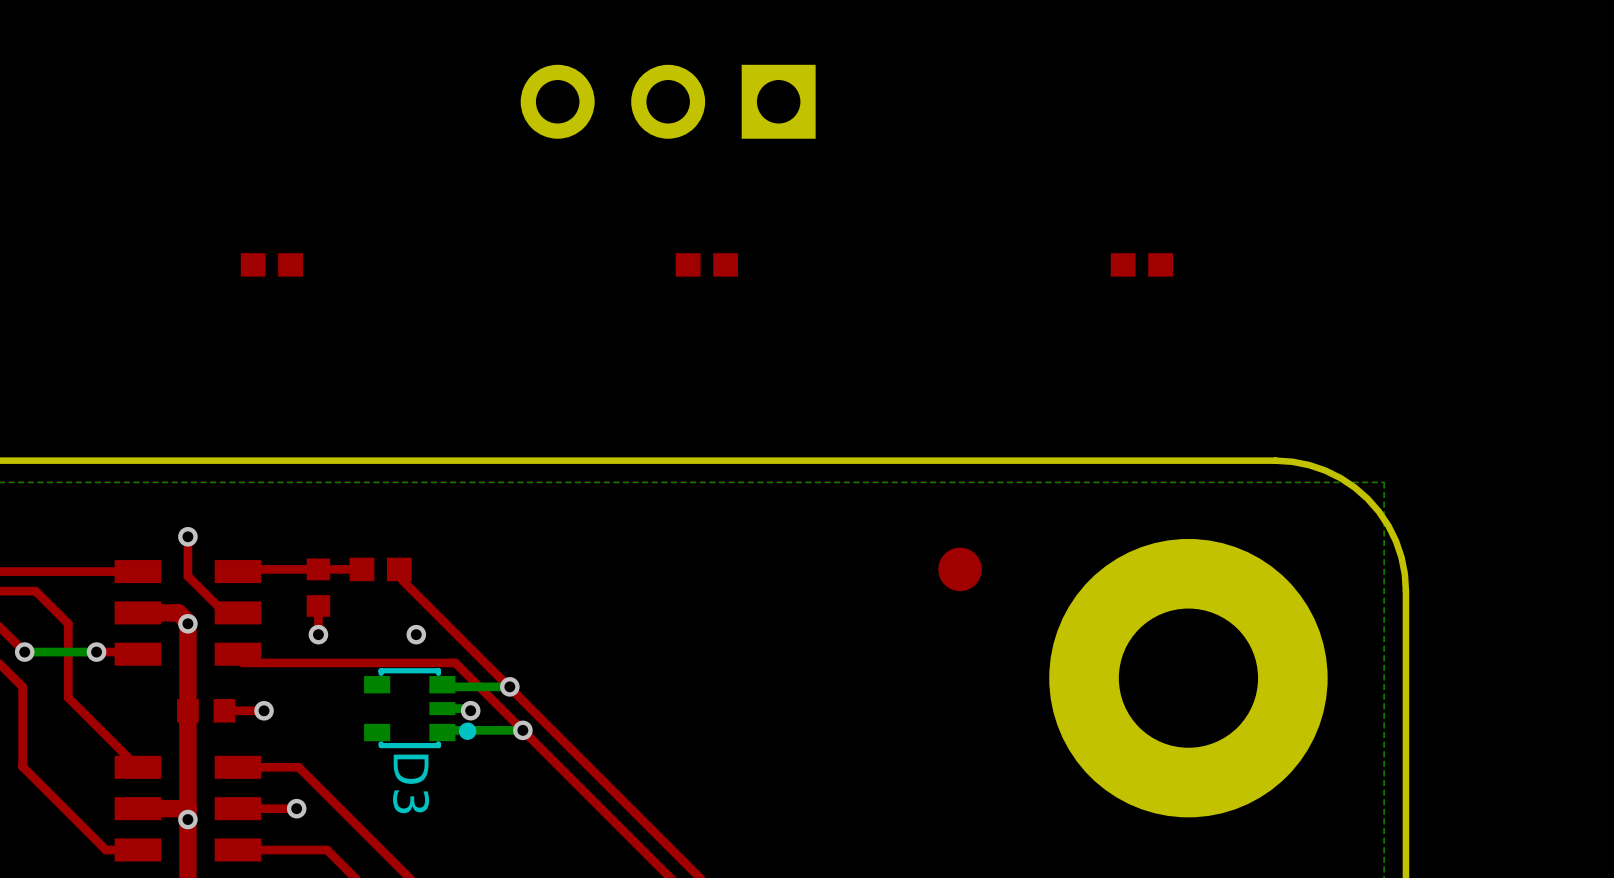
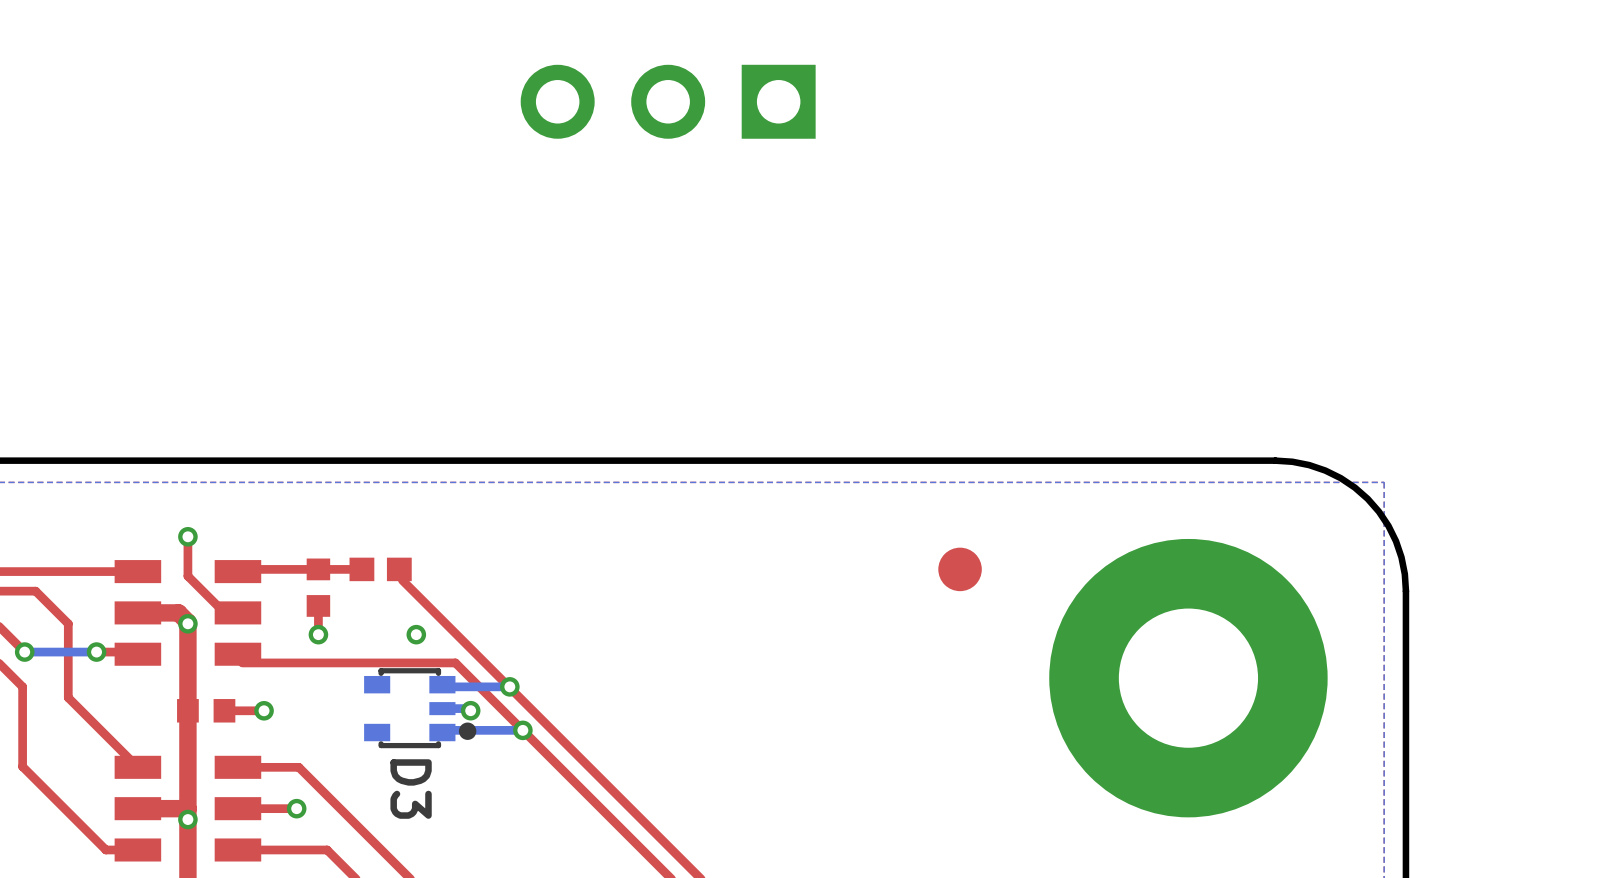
part: (271, 264) -> none
part: (706, 264) -> none
part: (1141, 264) -> none

